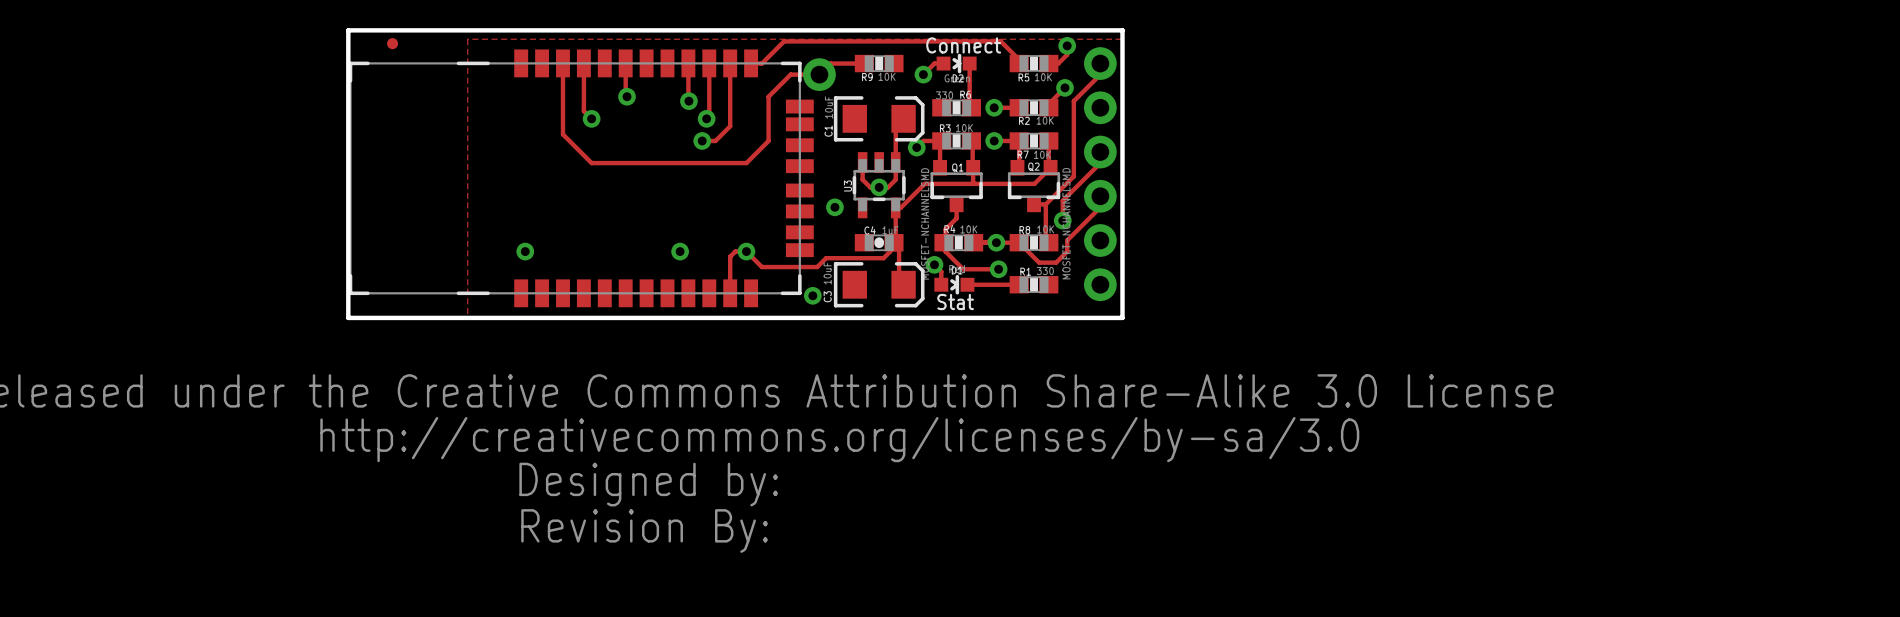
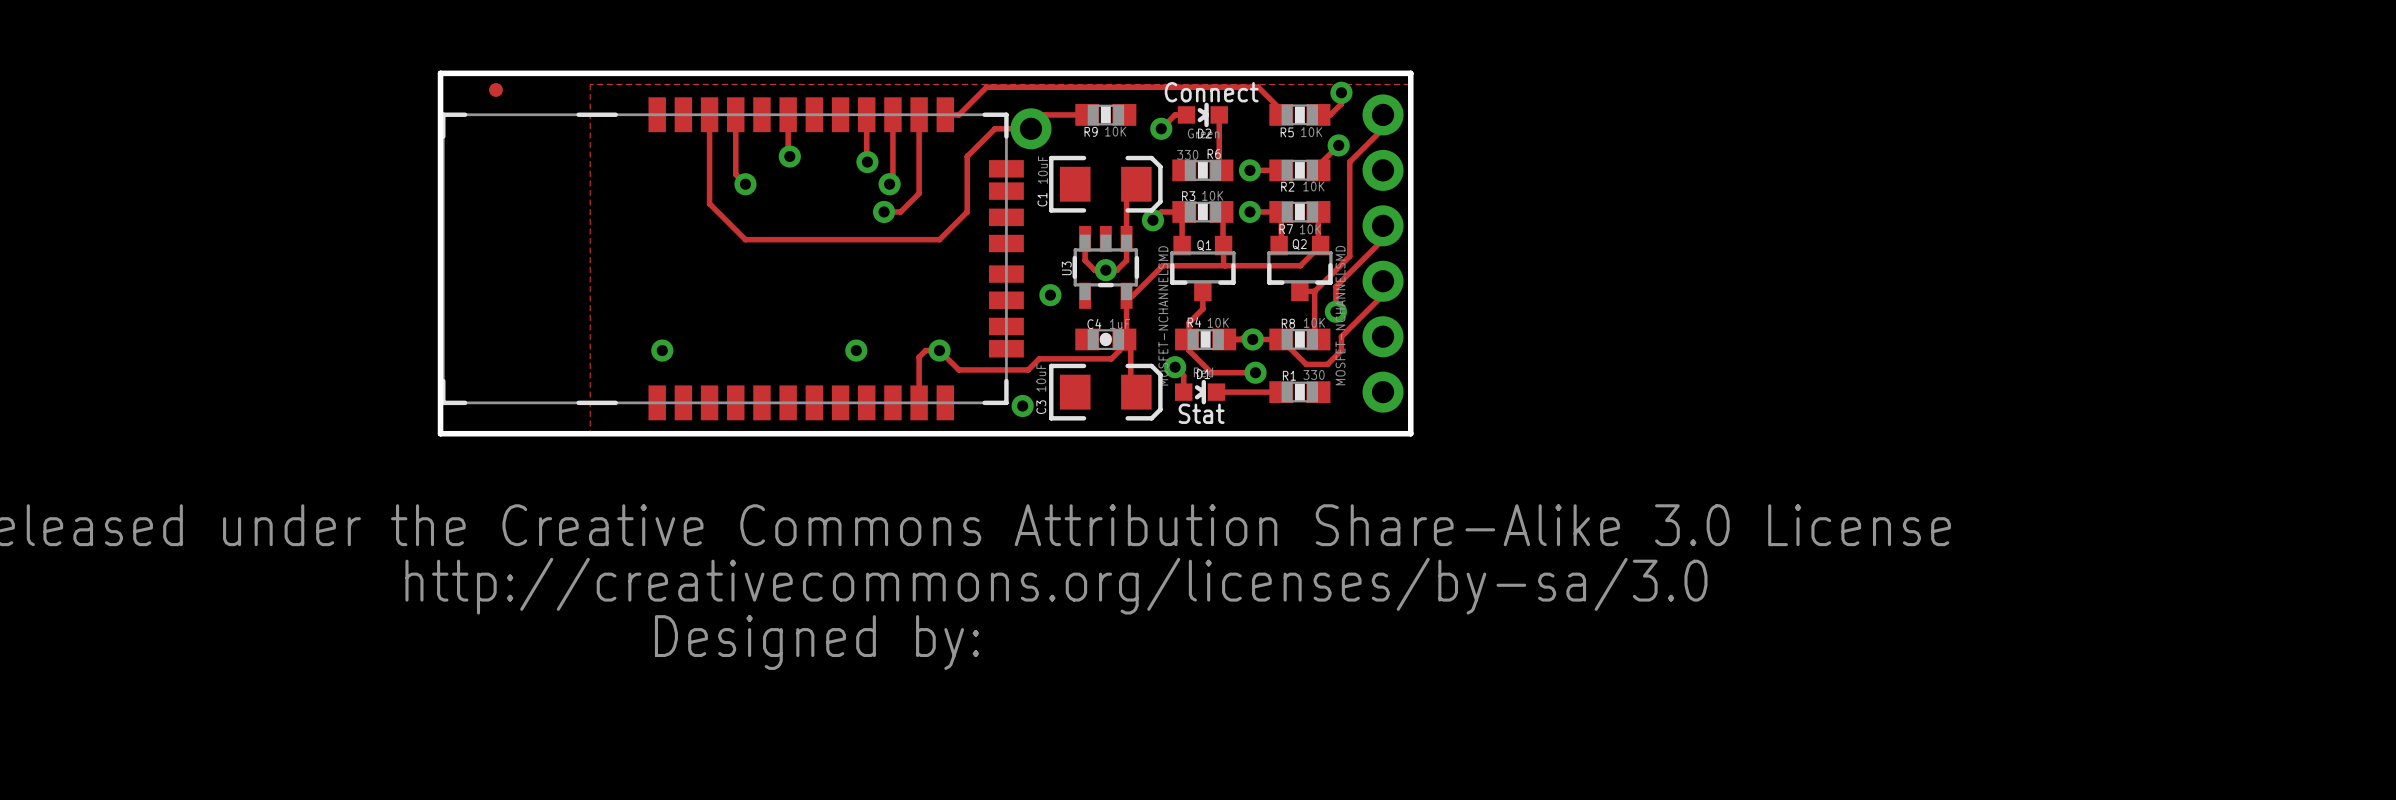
drawing: [521, 509, 768, 553] -> none

